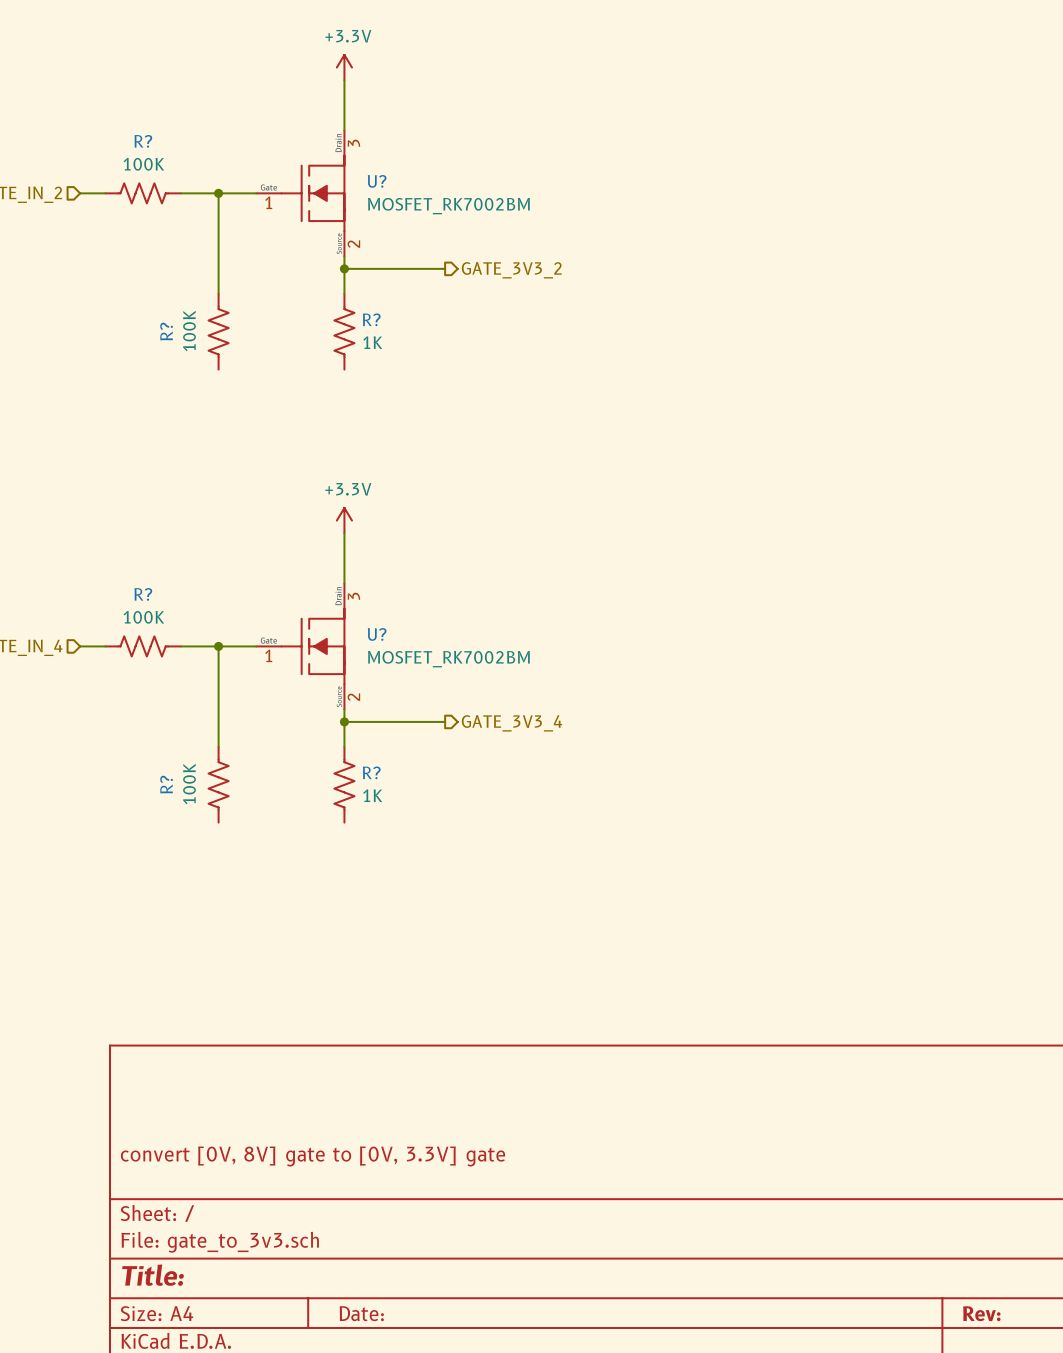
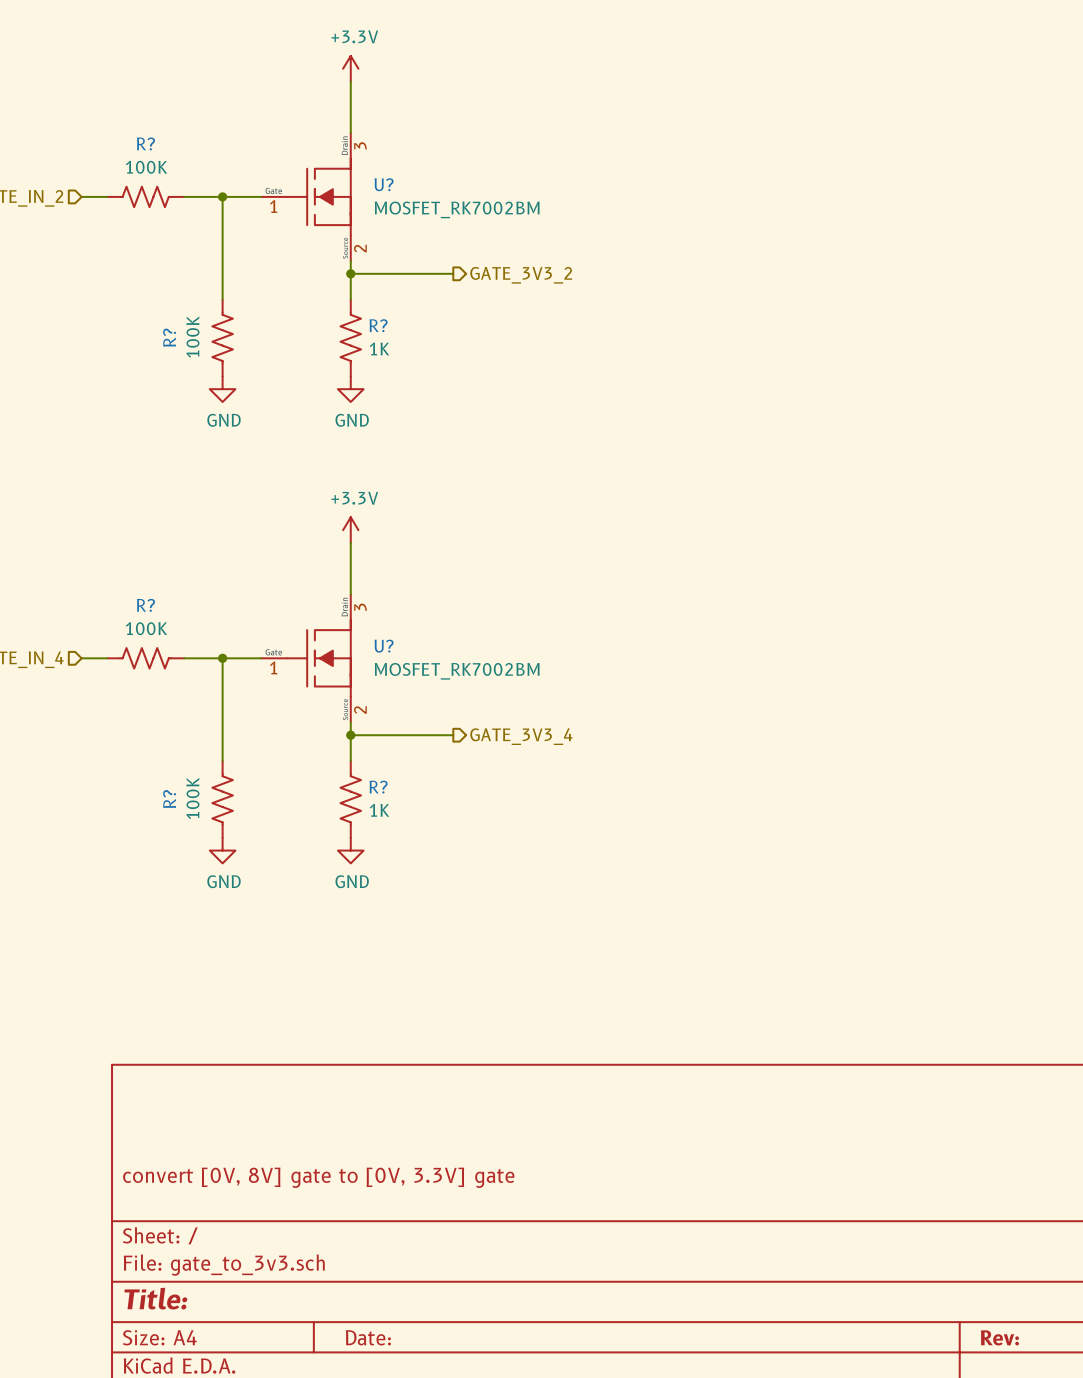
power symbol: none -> GND (222, 389)
power symbol: none -> GND (350, 389)
power symbol: none -> GND (222, 850)
power symbol: none -> GND (350, 850)

